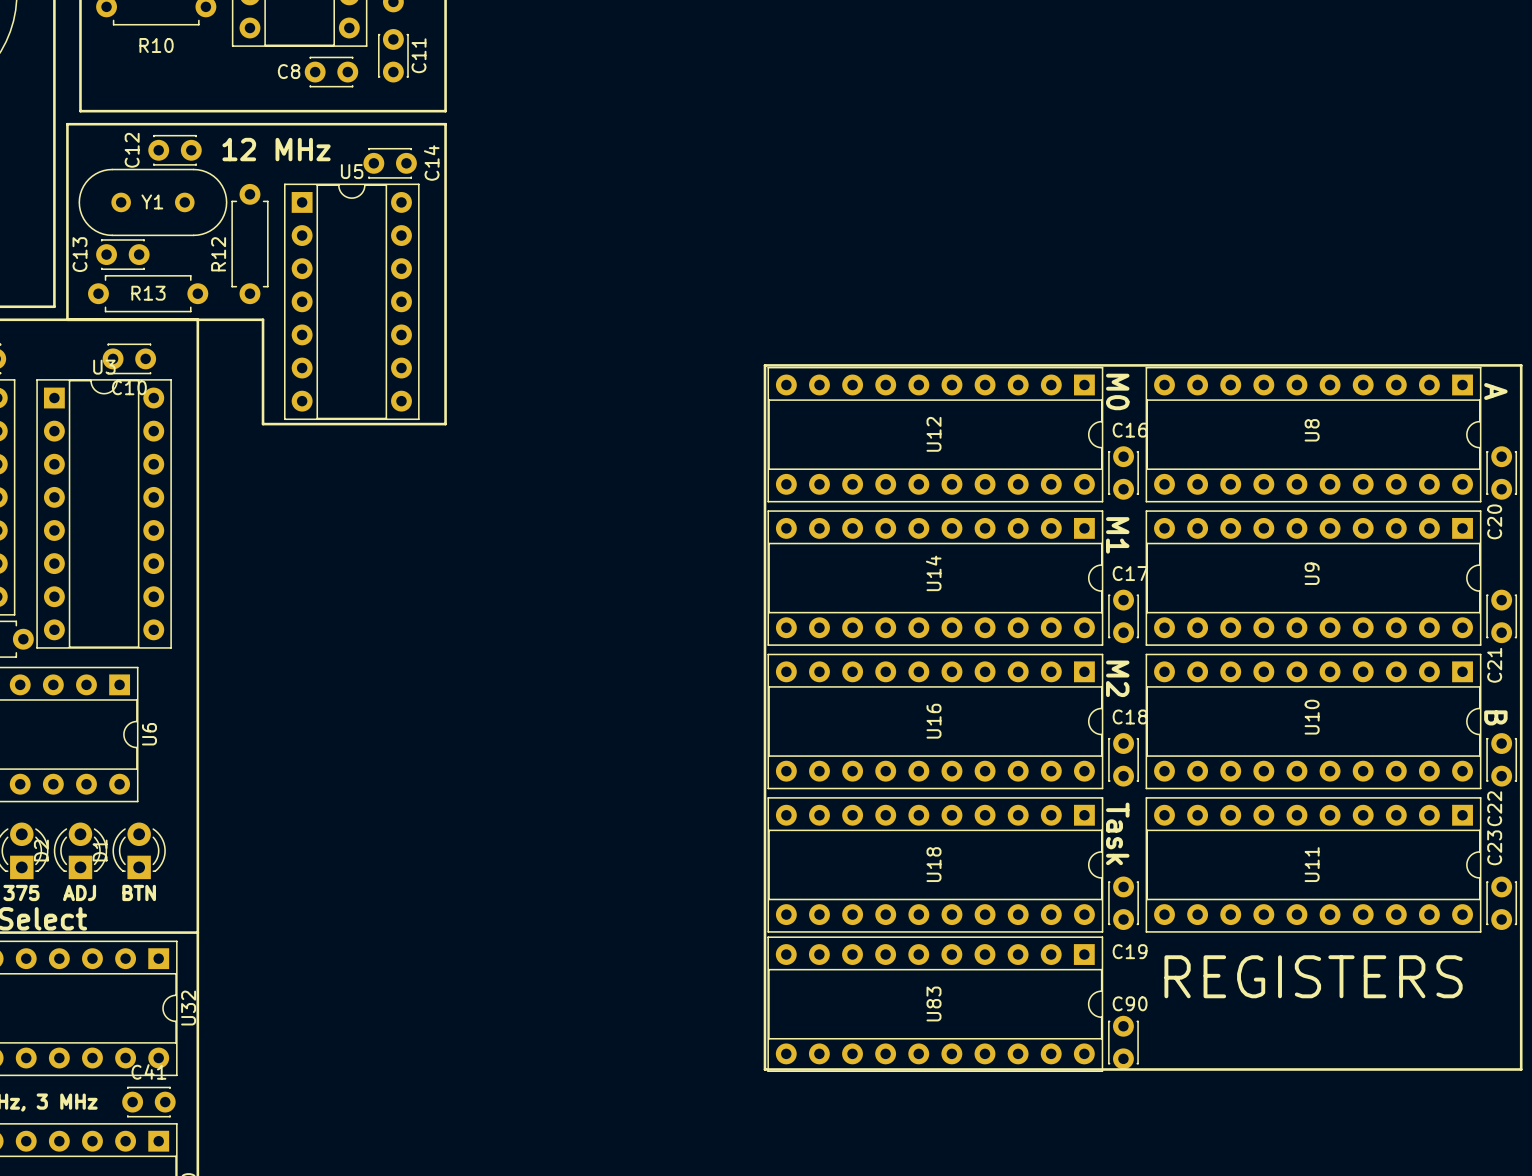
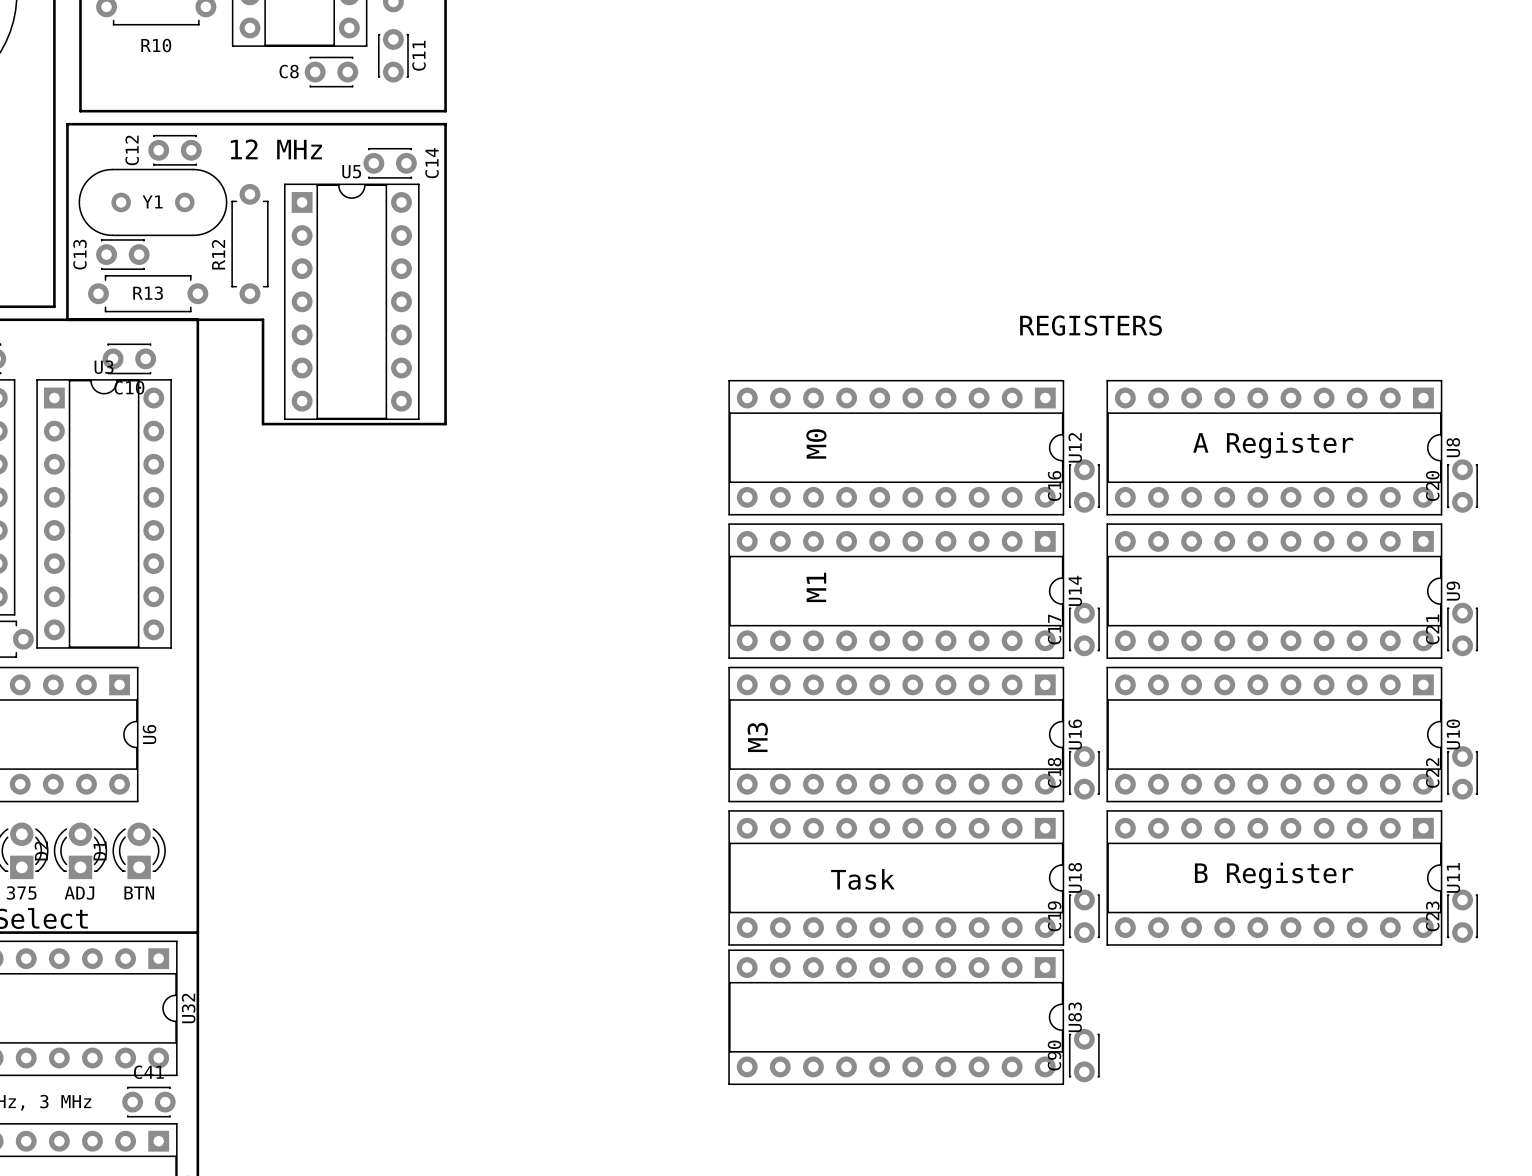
text: none -> REGISTERS (1091, 325)
line: (764, 365) (764, 1069) (1521, 1069) (1521, 365) (764, 365) -> none
text rotation: 0° (1117, 391) -> 180° (816, 443)
text position: M0 (1117, 391) -> M0 (816, 443)
text: A (1495, 391) -> none
C16 name rotation: 0° (1130, 430) -> 90° counterclockwise (1054, 486)
C16 name position: C16 (1130, 430) -> C16 (1054, 486)
U8 name position: U8 (1312, 430) -> U8 (1453, 447)
U12 name position: U12 (934, 434) -> U12 (1075, 447)
U12 position: (935, 434) -> (896, 447)
U8 position: (1313, 434) -> (1274, 447)
text: none -> A Register (1273, 445)
C16 position: (1123, 472) -> (1084, 486)
C20 position: (1501, 472) -> (1462, 486)
C20 name position: C20 (1494, 521) -> C20 (1432, 486)
text rotation: 0° (1117, 535) -> 180° (816, 587)
text position: M1 (1117, 535) -> M1 (816, 587)
U14 name position: U14 (933, 573) -> U14 (1075, 590)
C17 name rotation: 0° (1130, 573) -> 90° counterclockwise (1054, 629)
C17 name position: C17 (1130, 573) -> C17 (1054, 629)
U9 name position: U9 (1312, 573) -> U9 (1453, 591)
U14 position: (935, 578) -> (896, 591)
U9 position: (1313, 578) -> (1274, 591)
C17 position: (1123, 616) -> (1084, 629)
C21 position: (1501, 616) -> (1462, 629)
C21 name position: C21 (1494, 665) -> C21 (1432, 629)
text: M2 (1117, 678) -> none
C18 name rotation: 0° (1130, 716) -> 90° counterclockwise (1054, 772)
C18 name position: C18 (1130, 716) -> C18 (1054, 772)
U10 name position: U10 (1312, 717) -> U10 (1453, 734)
text: B (1495, 717) -> none
U16 name position: U16 (934, 721) -> U16 (1075, 734)
U16 position: (935, 721) -> (896, 734)
U10 position: (1313, 721) -> (1274, 734)
text: none -> M3 (757, 737)
C18 position: (1123, 759) -> (1084, 772)
C22 position: (1501, 759) -> (1462, 772)
C22 name position: C22 (1494, 808) -> C22 (1432, 773)
text rotation: 0° (1117, 833) -> 90° counterclockwise (862, 879)
text position: Task (1117, 833) -> Task (862, 879)
C23 name position: C23 (1494, 847) -> C23 (1432, 916)
U18 name position: U18 (934, 864) -> U18 (1075, 877)
U18 position: (935, 864) -> (896, 877)
U11 name position: U11 (1312, 864) -> U11 (1453, 877)
U11 position: (1313, 864) -> (1274, 877)
text: none -> B Register (1274, 875)
C19 position: (1123, 903) -> (1084, 916)
C23 position: (1501, 903) -> (1462, 916)
C19 name rotation: 0° (1130, 951) -> 90° counterclockwise (1054, 916)
C19 name position: C19 (1130, 951) -> C19 (1054, 916)
text: REGISTERS (1313, 976) -> none
U83 name position: U83 (934, 1003) -> U83 (1075, 1017)
C90 name rotation: 0° (1130, 1003) -> 90° counterclockwise (1054, 1055)
C90 name position: C90 (1130, 1003) -> C90 (1054, 1055)
U83 position: (935, 1004) -> (896, 1017)
C90 position: (1123, 1042) -> (1084, 1055)

